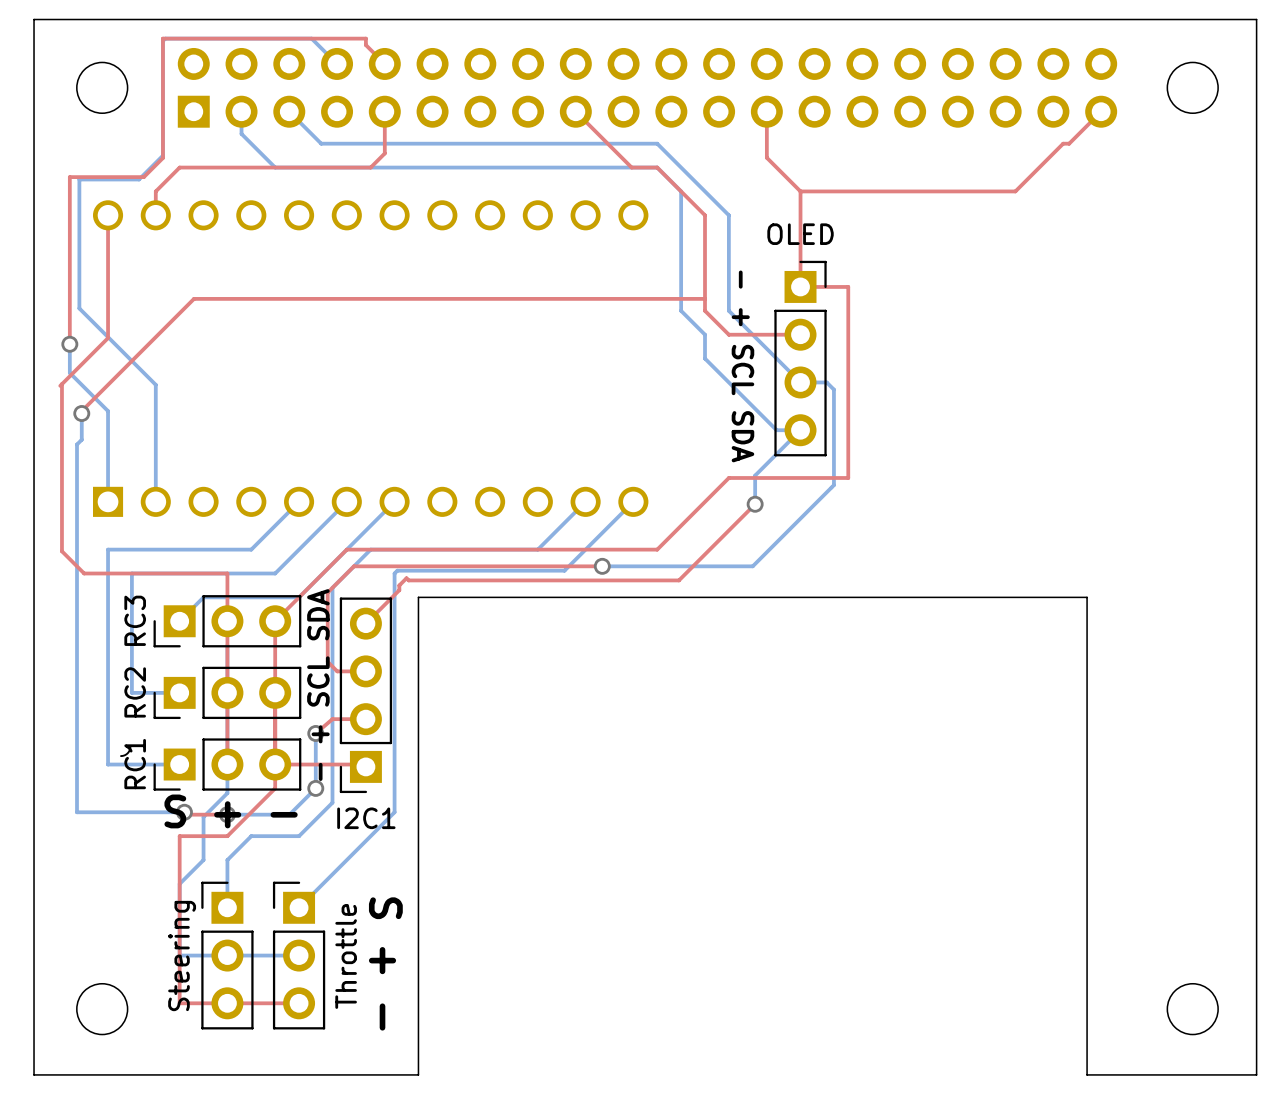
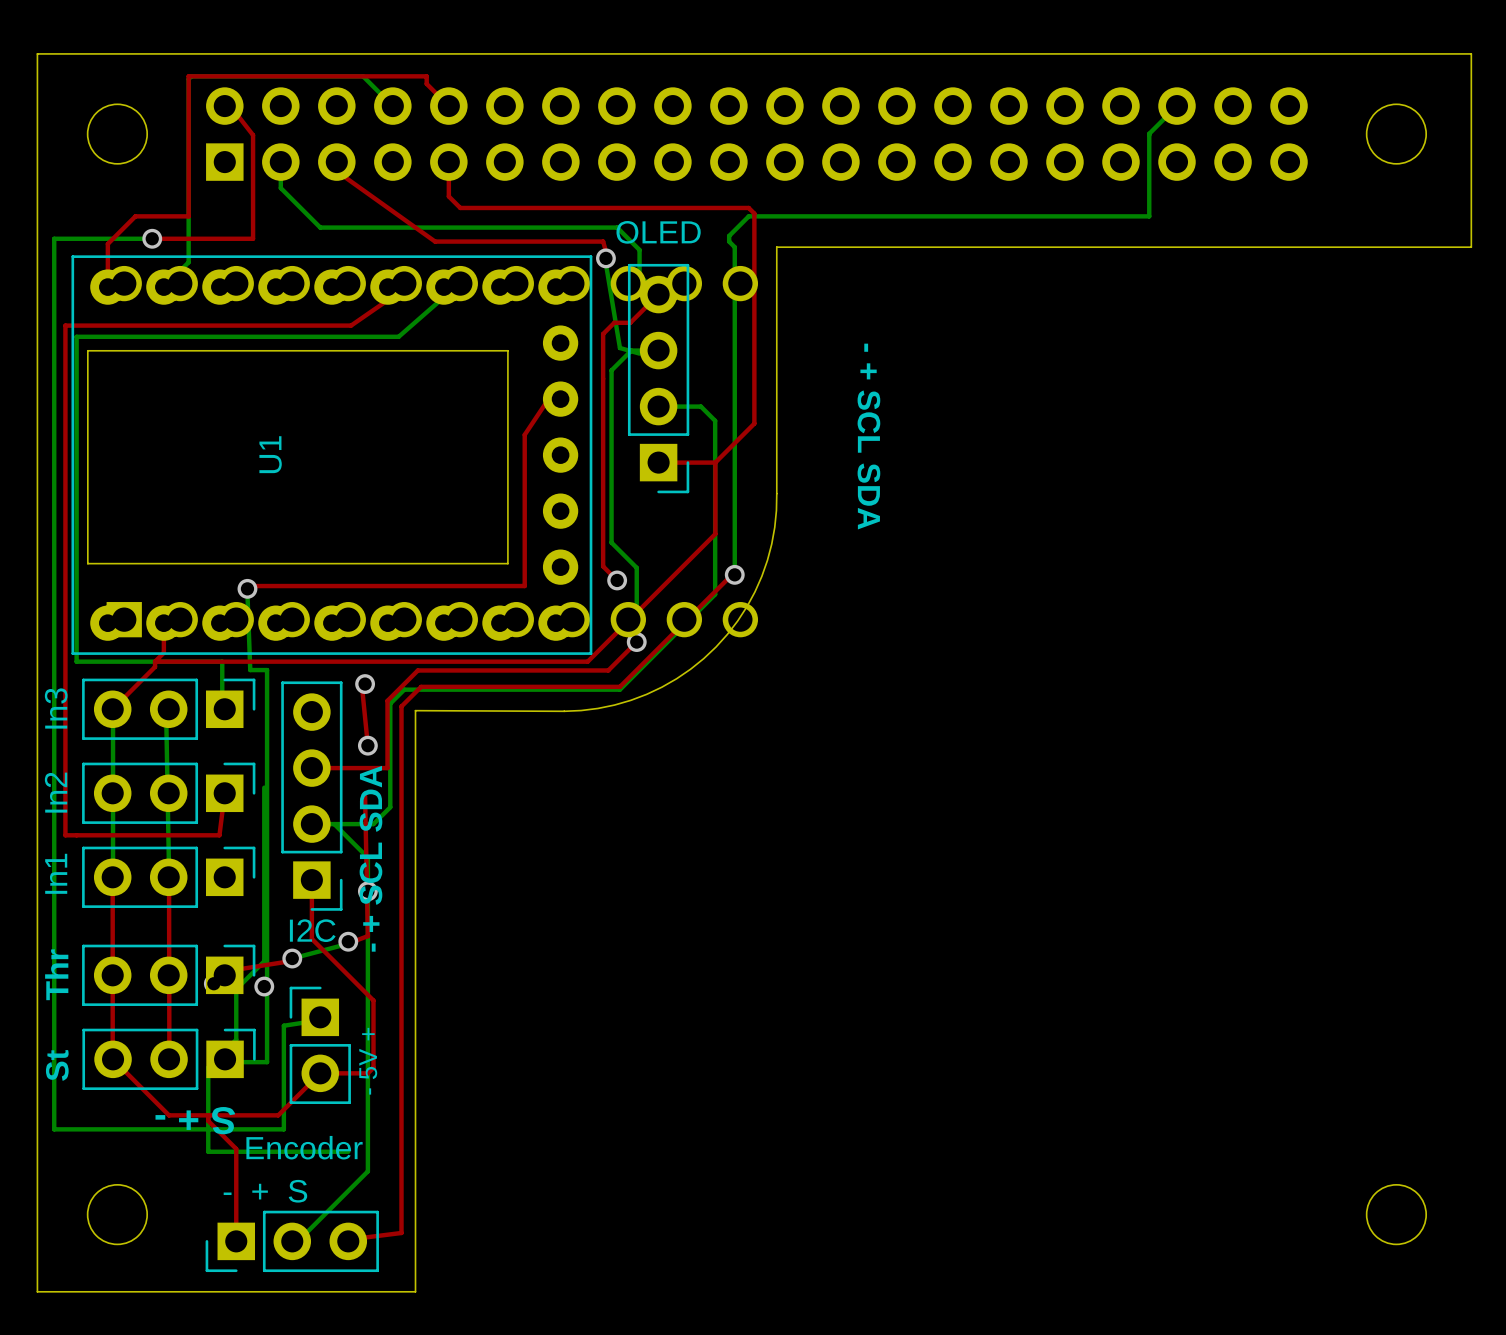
bottom track: none -> (1176, 106) (1149, 133) (1149, 216) (748, 216) (729, 235) (729, 241) (734, 247) (734, 574)
top track: none -> (233, 109) (253, 135) (253, 238) (166, 238)
bottom track: (289, 111) (321, 143) (657, 143) (728, 215) (728, 310) (800, 382) (826, 382) (833, 389) (833, 485) (752, 566) (602, 566) -> none
top track: (575, 111) (631, 167) (657, 167) (705, 215) (705, 310) (728, 334) (800, 334) -> none
top track: (766, 111) (766, 157) (800, 191) -> none
top track: (1101, 111) (1069, 143) (1063, 143) (1015, 191) (800, 191) -> none
top track: none -> (337, 171) (435, 241) (603, 241) (608, 261)
top track: (384, 141) (384, 153) (370, 167) (179, 167) (155, 191) (155, 215) -> (448, 196) (460, 207) (748, 207) (754, 213) (754, 423) (715, 462)
bottom track: (162, 155) (139, 179) (79, 179) (79, 308) (155, 384) (155, 501) -> (188, 213) (188, 262) (163, 287)
top track: (162, 158) (143, 177) -> (188, 216) (135, 216) (107, 243) (107, 287)
bottom track: (528, 167) (657, 167) (681, 191) (681, 310) (705, 334) (705, 358) (776, 430) (800, 430) (755, 475) (755, 504) -> (617, 227) (639, 249) (639, 275) (658, 294)
bottom track: none -> (146, 238) (54, 238) (54, 1129) (283, 1129) (283, 1025) (320, 1020)
via: none -> (152, 238)
top track: (134, 177) (69, 177) (69, 344) -> none
board edge: (1256, 184) (1256, 1074) (1087, 1074) (1087, 597) (418, 597) (418, 1074) (356, 1074) -> (1471, 247) (776, 247) (776, 493) (774, 527) (761, 576) (746, 606) (727, 634) (703, 658) (676, 678) (646, 694) (614, 705) (564, 711) (415, 710) (415, 1291)
top track: (800, 191) (800, 286) (848, 286) (848, 477) (728, 477) (657, 549) (346, 549) (275, 621) (275, 788) (227, 836) (179, 836) (179, 924) -> none
via: none -> (605, 258)
bottom track: none -> (605, 263) (619, 348) (639, 353)
top track: (108, 215) (108, 338) (60, 385) -> none
top track: none -> (658, 294) (630, 322) (614, 322) (603, 333) (603, 566) (617, 580)
bottom track: none -> (443, 297) (398, 336) (76, 336) (76, 661) (222, 661) (222, 700)
top track: none -> (387, 300) (351, 325) (65, 325) (65, 835) (219, 835) (224, 793)
board edge: none -> (87, 350) (507, 350) (507, 563) (87, 563) (87, 350)
bottom track: none -> (658, 350) (631, 350) (611, 370) (611, 542) (636, 567) (636, 642)
OLED: none -> (658, 378)
top track: (705, 298) (194, 298) (81, 411) (81, 413) (79, 413) -> none
top track: none -> (547, 401) (524, 434) (524, 586) (250, 586)
bottom track: none -> (658, 406) (700, 406) (715, 420) (715, 594) (619, 689) (404, 689) (390, 703) (390, 807) (373, 824) (311, 824)
bottom track: (69, 344) (69, 372) (108, 411) (108, 501) -> none
via: (69, 344) -> none
OLED: (800, 358) -> none
U1: none -> (331, 455)
top track: none -> (658, 462) (715, 462)
top track: none -> (715, 462) (715, 534) (587, 661) (155, 661)
top track: (61, 384) (61, 551) (84, 573) (227, 573) (227, 764) -> none
bottom track: (81, 413) (81, 439) (76, 444) (76, 812) (184, 812) -> none
via: (81, 413) -> none
via: none -> (734, 574)
via: none -> (617, 580)
via: none -> (247, 588)
bottom track: none -> (247, 594) (250, 670) (267, 670) (267, 1062) (227, 1062)
bottom track: (299, 501) (251, 549) (108, 549) (108, 764) (179, 764) -> none
bottom track: (346, 501) (275, 573) (131, 573) (131, 692) (179, 692) -> none
bottom track: (394, 501) (299, 597) (203, 597) (179, 621) -> none
bottom track: (585, 501) (537, 549) (370, 549) (332, 587) (332, 802) (299, 836) (251, 836) (227, 860) (227, 907) -> none
bottom track: (633, 501) (564, 570) (397, 570) (394, 573) (394, 812) (299, 907) -> none
top track: none -> (163, 623) (163, 652) (155, 661)
top track: (755, 504) (678, 580) (408, 580) (406, 578) (399, 585) (399, 590) (365, 623) -> none
via: (755, 504) -> none
top track: none -> (636, 642) (608, 670) (417, 670) (387, 700) (387, 768) (311, 768)
via: none -> (636, 642)
top track: none -> (155, 661) (155, 666) (112, 709)
via: none -> (365, 684)
top track: none -> (362, 689) (367, 745)
top track: (353, 566) (602, 566) -> (412, 695) (421, 686) (619, 686) (731, 574)
via: (602, 566) -> none
top track: (344, 575) (327, 592) (327, 661) (337, 671) (365, 671) -> (401, 706) (401, 1232) (356, 1238)
In3: none -> (168, 709)
bottom track: none -> (166, 717) (169, 871)
bottom track: none -> (113, 720) (113, 868)
via: none -> (367, 745)
RC3: (227, 621) -> none
In2: none -> (168, 793)
I2C: none -> (311, 796)
top track: none -> (365, 796) (367, 936) (345, 944)
bottom track: none -> (334, 824) (367, 857) (367, 891)
RC2: (227, 692) -> none
I2C1: (365, 695) -> none
top track: (365, 719) (332, 719) (315, 733) (318, 733) -> none
top track: none -> (112, 877) (112, 1059) (169, 1115) (278, 1115) (320, 1073) (367, 1073) (373, 1067) (373, 1000) (311, 938) (311, 880)
In1: none -> (168, 877)
top track: none -> (169, 877) (169, 1059)
board edge: (130, 746) (127, 753) (121, 756) -> none
RC1: (227, 764) -> none
top track: (275, 764) (363, 764) (365, 766) -> none
bottom track: none -> (345, 944) (292, 958)
bottom track: (315, 788) (289, 814) (227, 814) -> (367, 955) (367, 1171) (292, 1246)
via position: (315, 788) -> (348, 941)
via: none -> (292, 958)
top track: none -> (289, 961) (236, 969)
text: none -> Thr (56, 974)
part: none -> (168, 975)
text: S + - (231, 811) -> none
top track: (184, 812) (186, 814) (227, 814) -> none
text: none -> - 5V + (368, 1061)
part: none -> (320, 1045)
part: none -> (169, 1059)
text: none -> St (57, 1065)
text: none -> S + - (195, 1120)
top track: (179, 929) (179, 1003) (299, 1003) -> (208, 1120) (236, 1148) (236, 1246)
Steering: (227, 955) -> none
Throttle: (299, 955) -> none
text: S + - (385, 963) -> none
text: none -> - + S (265, 1191)
Encoder: none -> (292, 1241)

